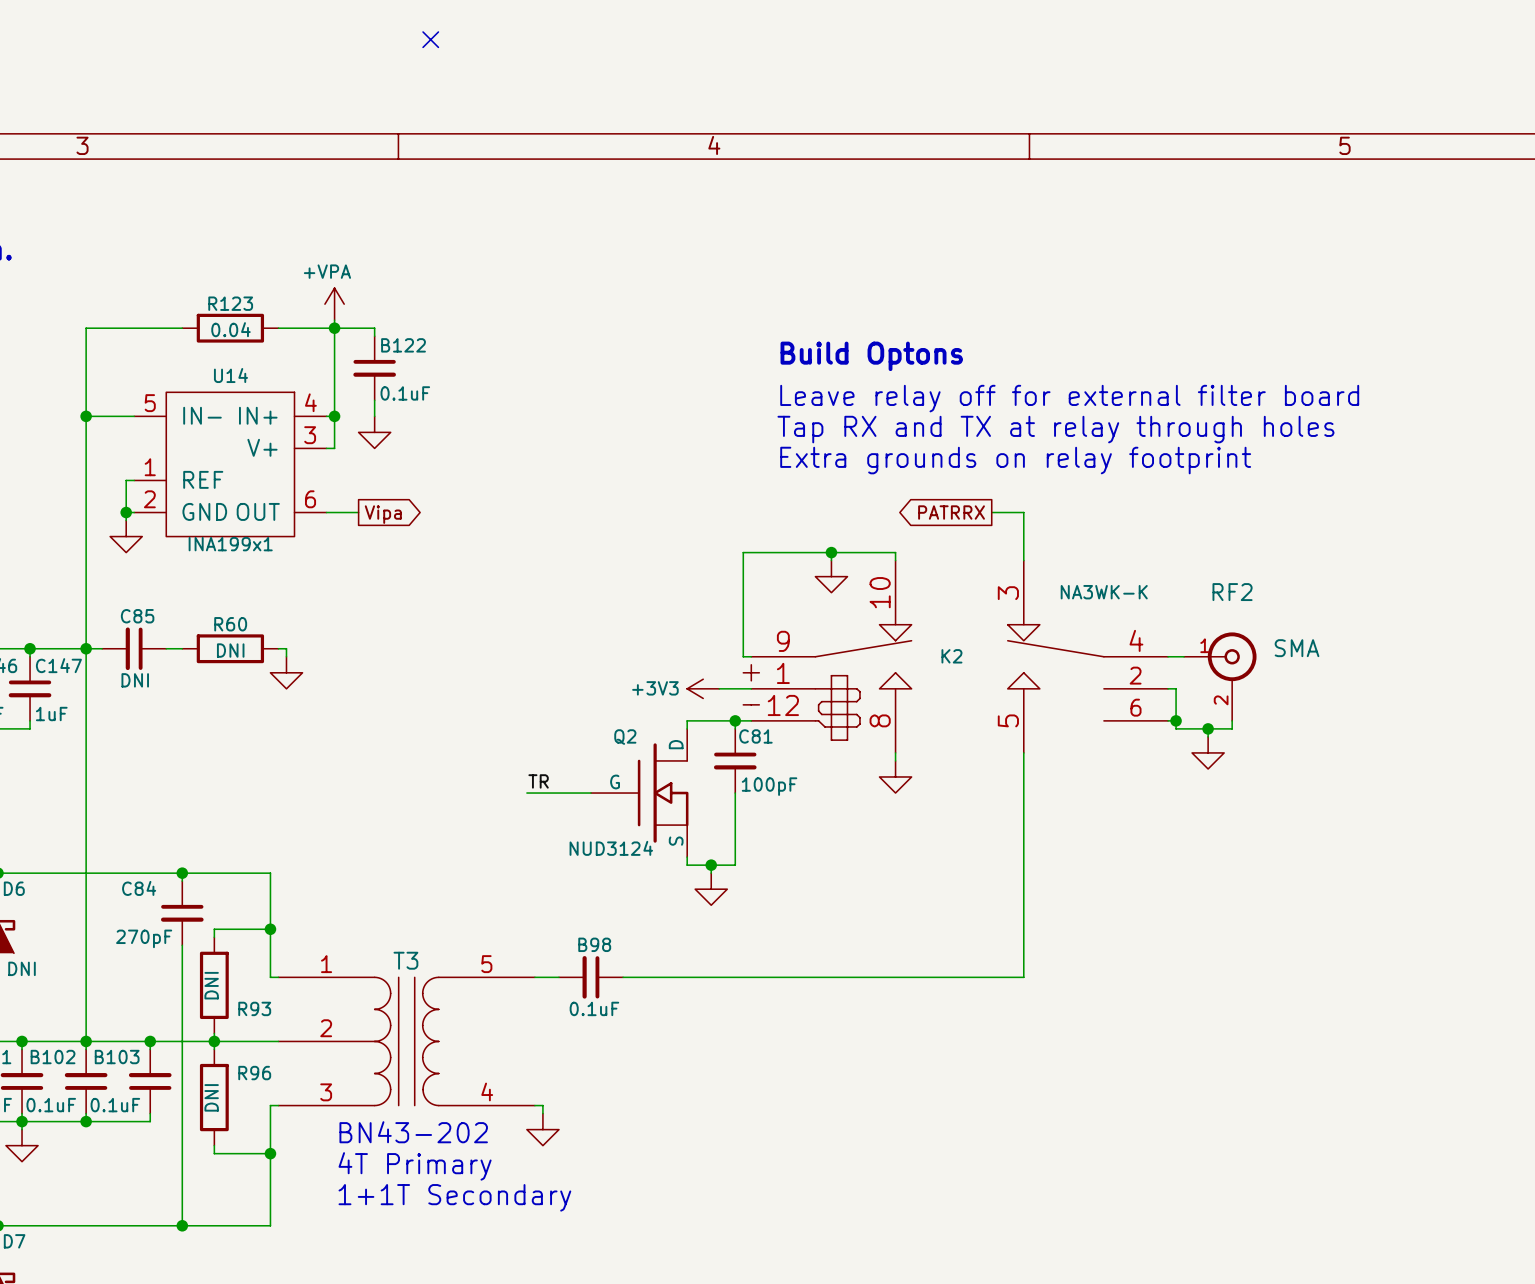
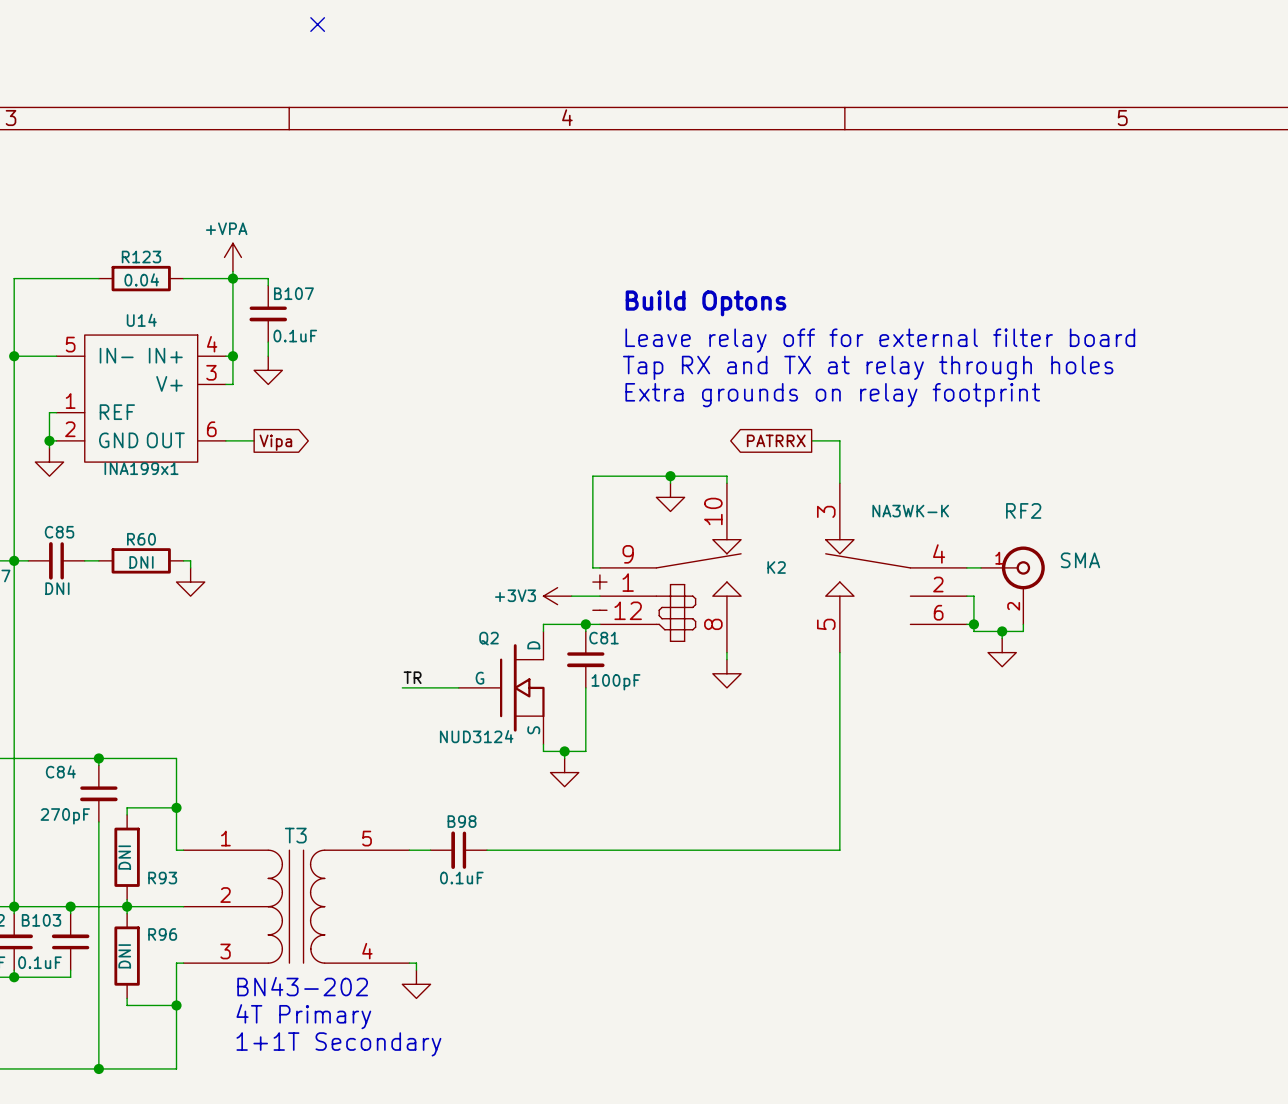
B122 name: B122 (403, 345) -> B107 (293, 293)

